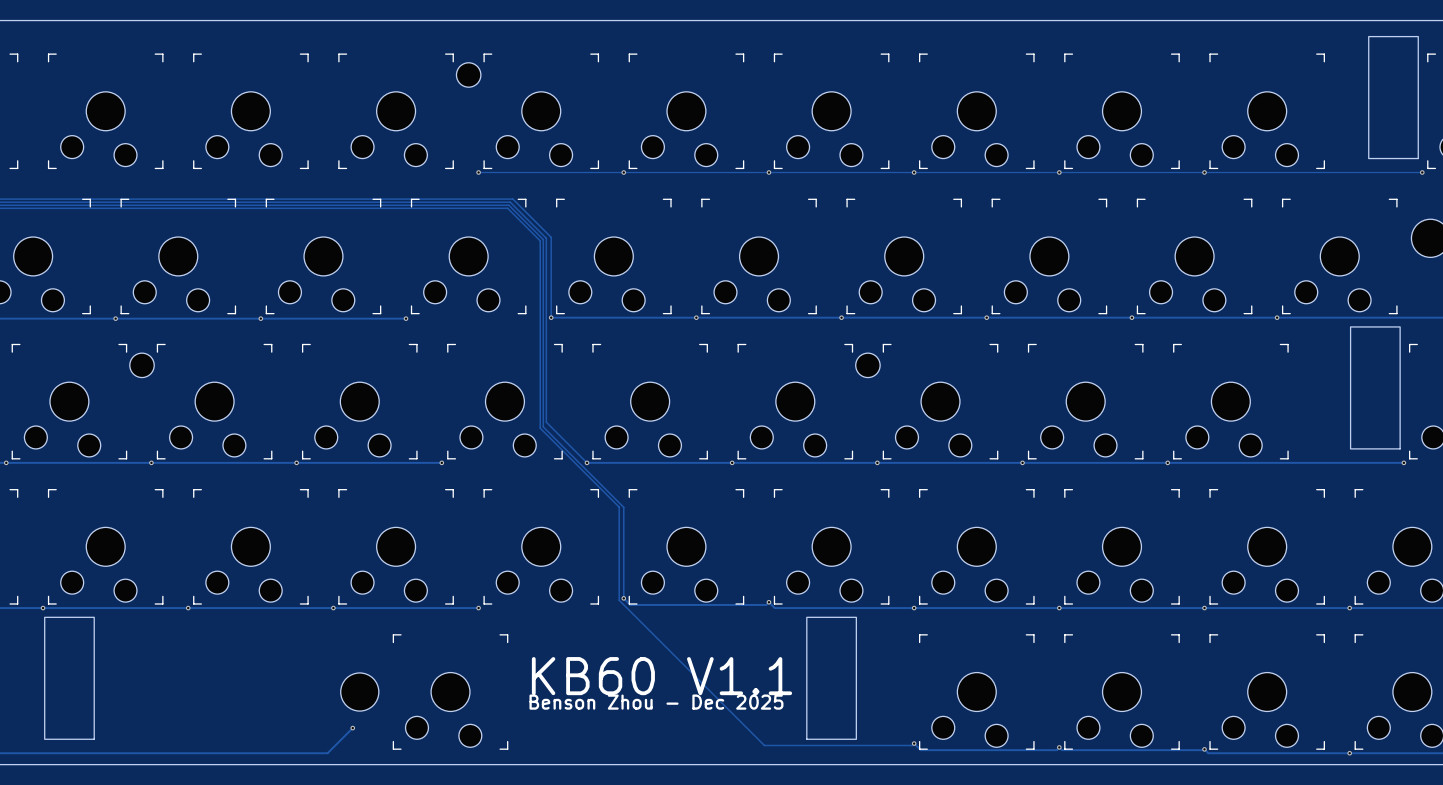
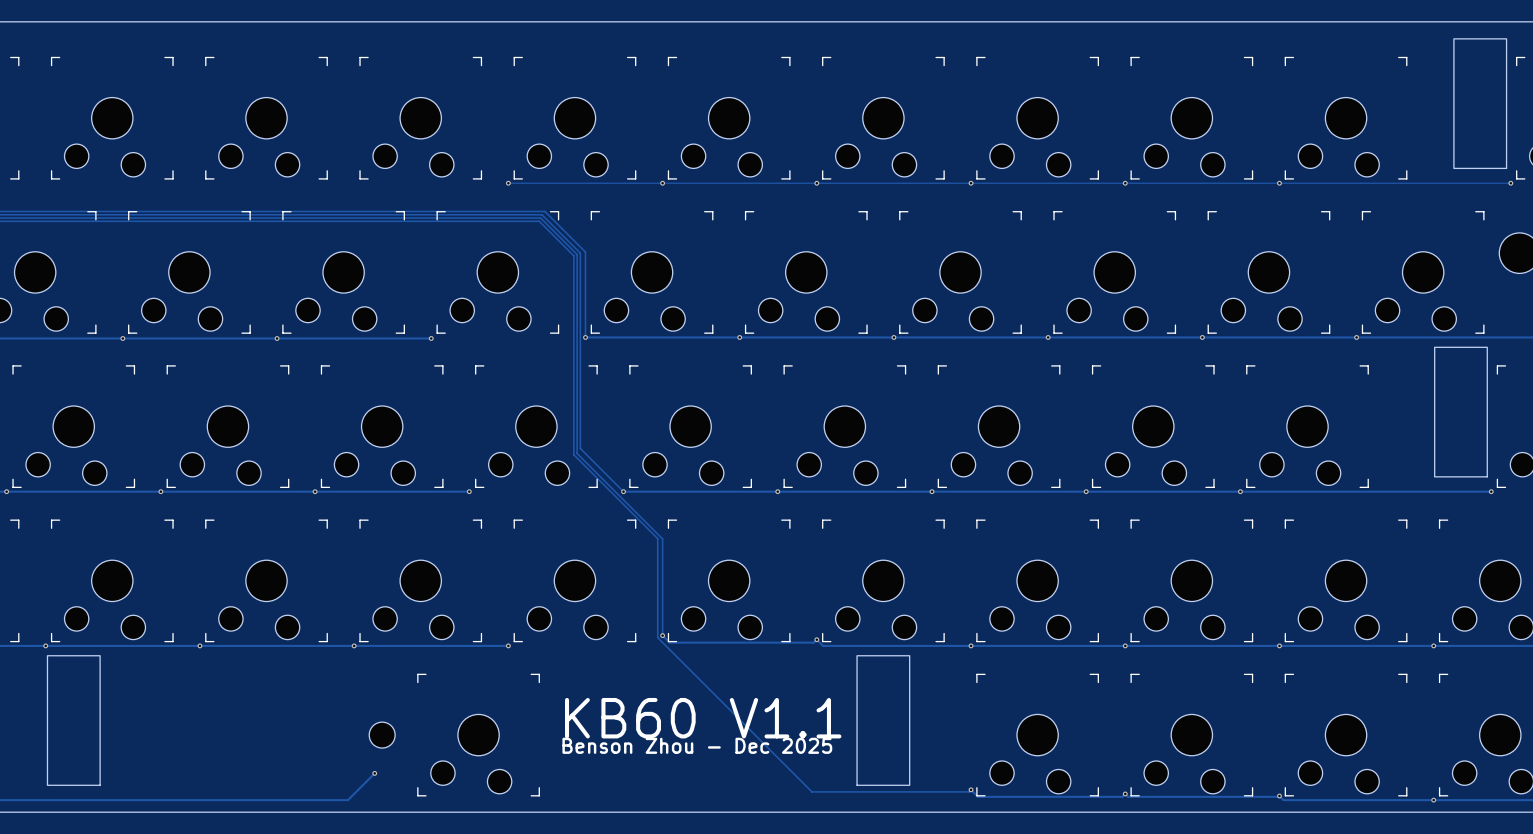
part: (468, 74) -> none
part: (142, 365) -> none
part: (867, 365) -> none
part footprint: [340, 672, 379, 712] -> [369, 722, 396, 749]

